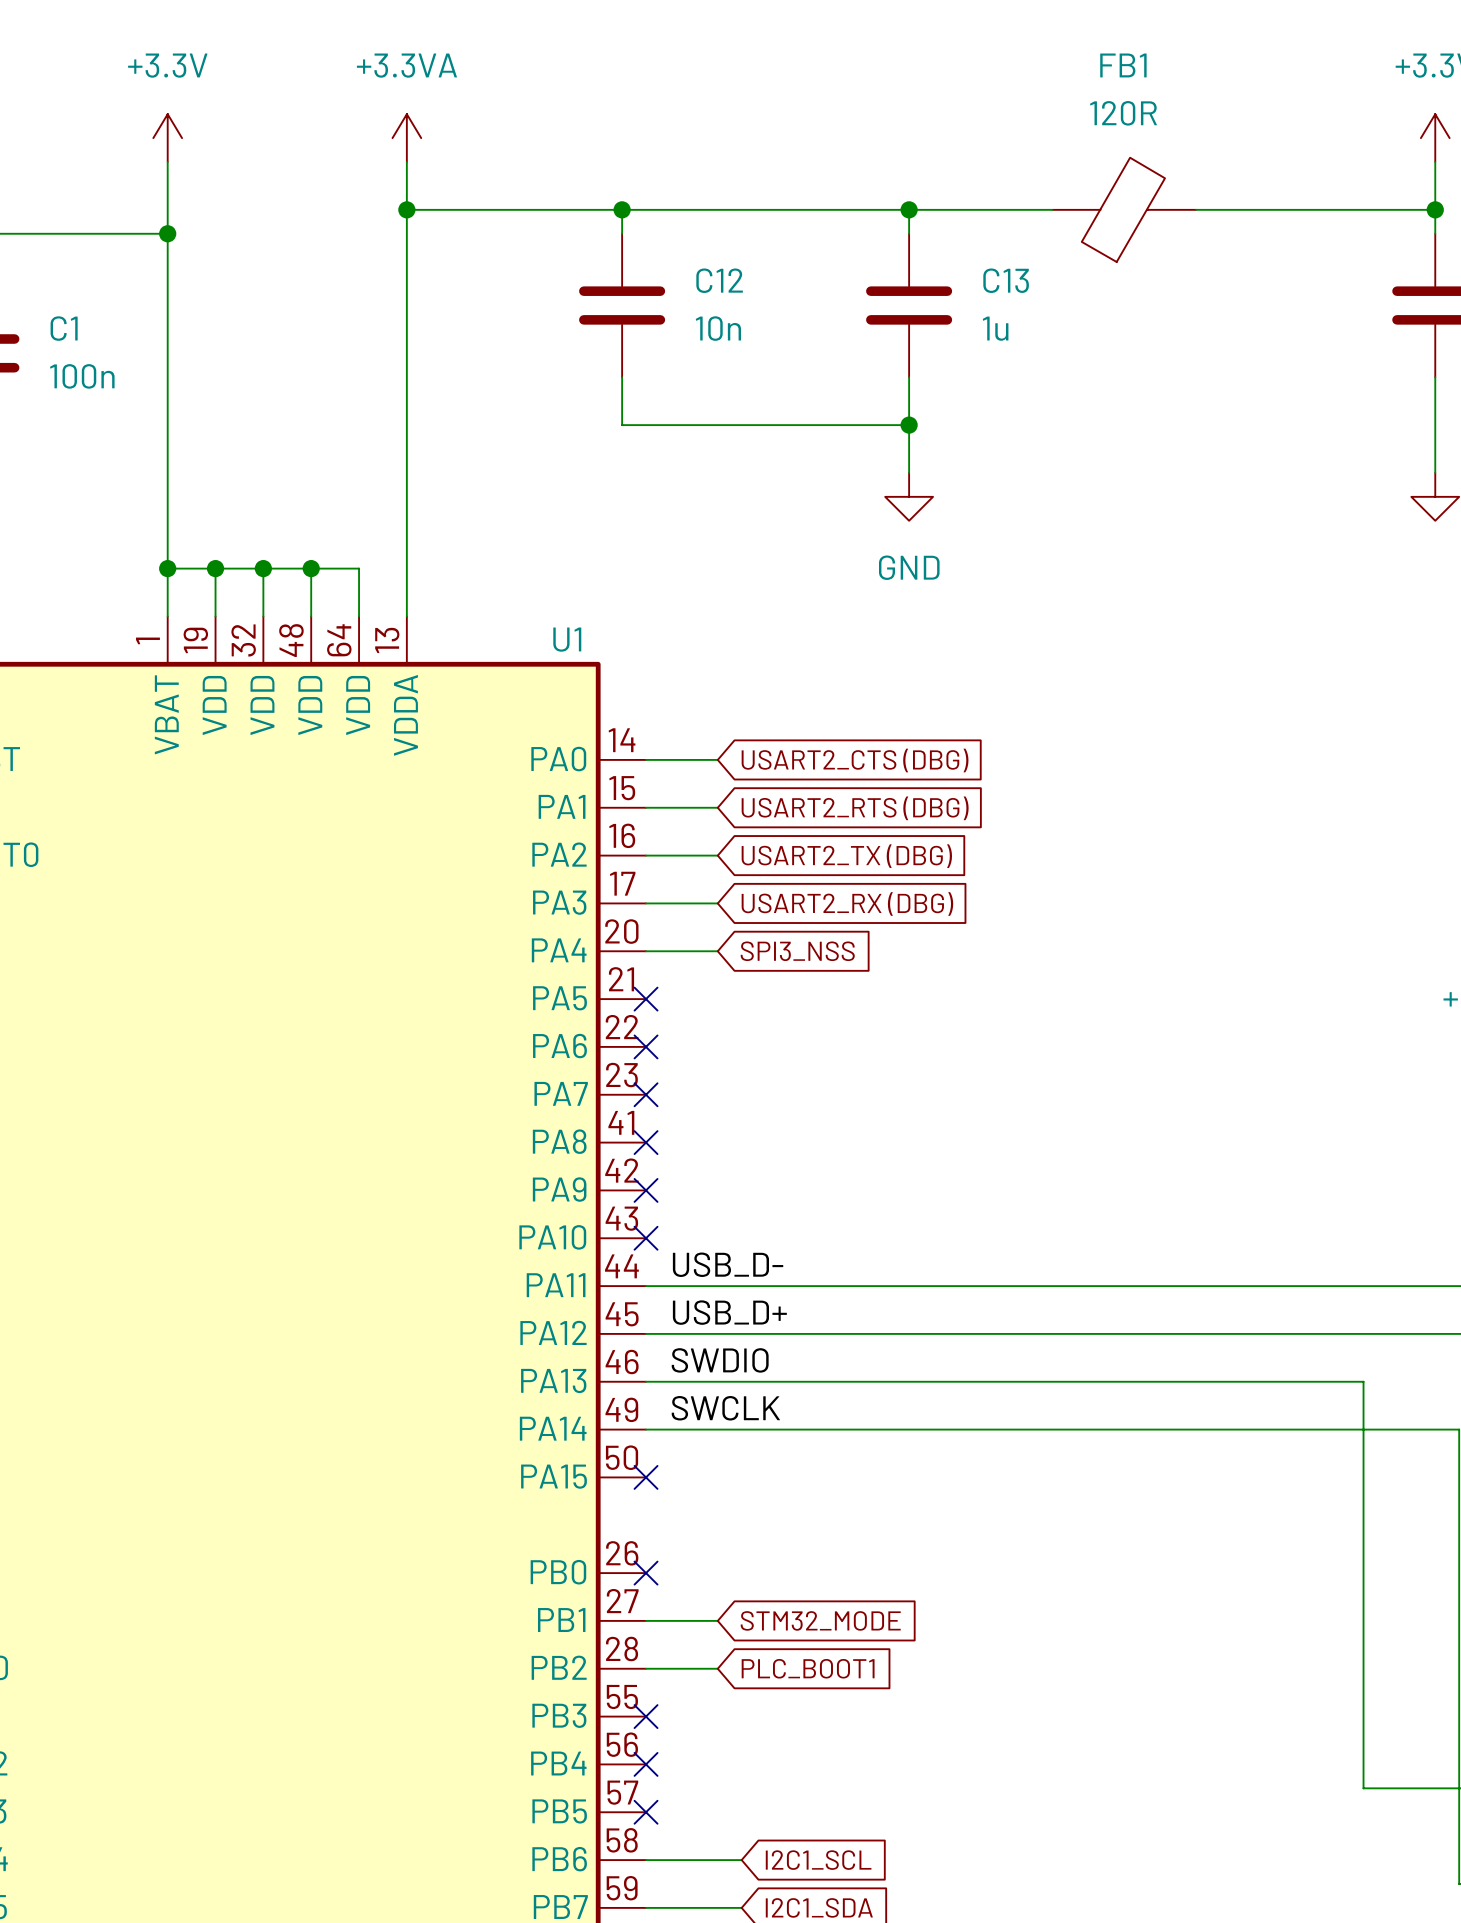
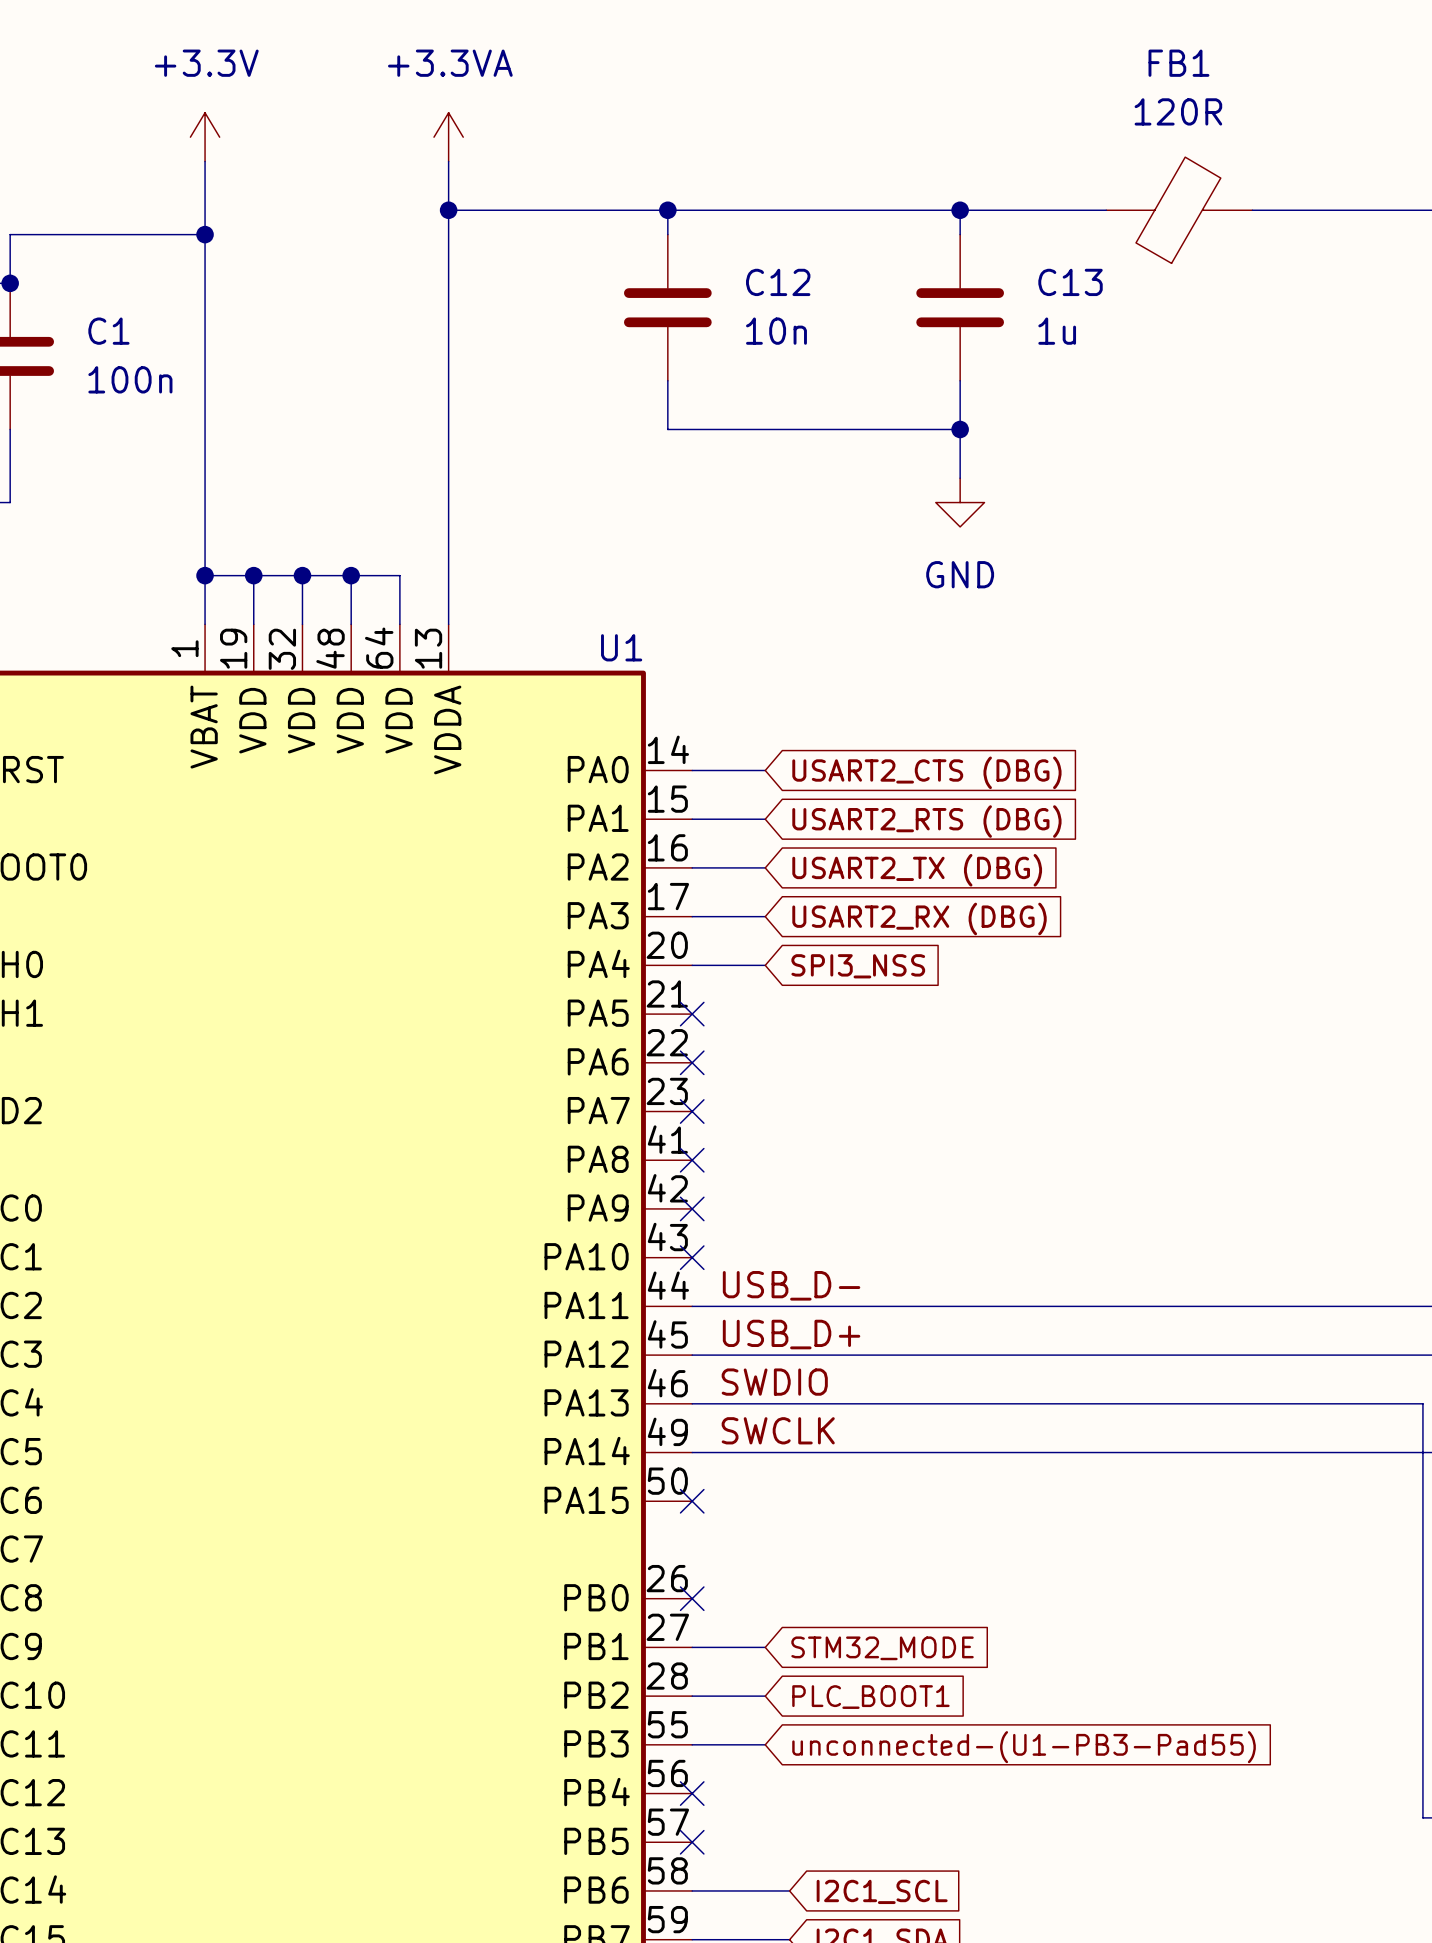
wire: none -> (692, 1744) (765, 1744)
no-connect mark: (646, 1716) -> none
global label: none -> unconnected-(U1-PB3-Pad55) (1024, 1747)

